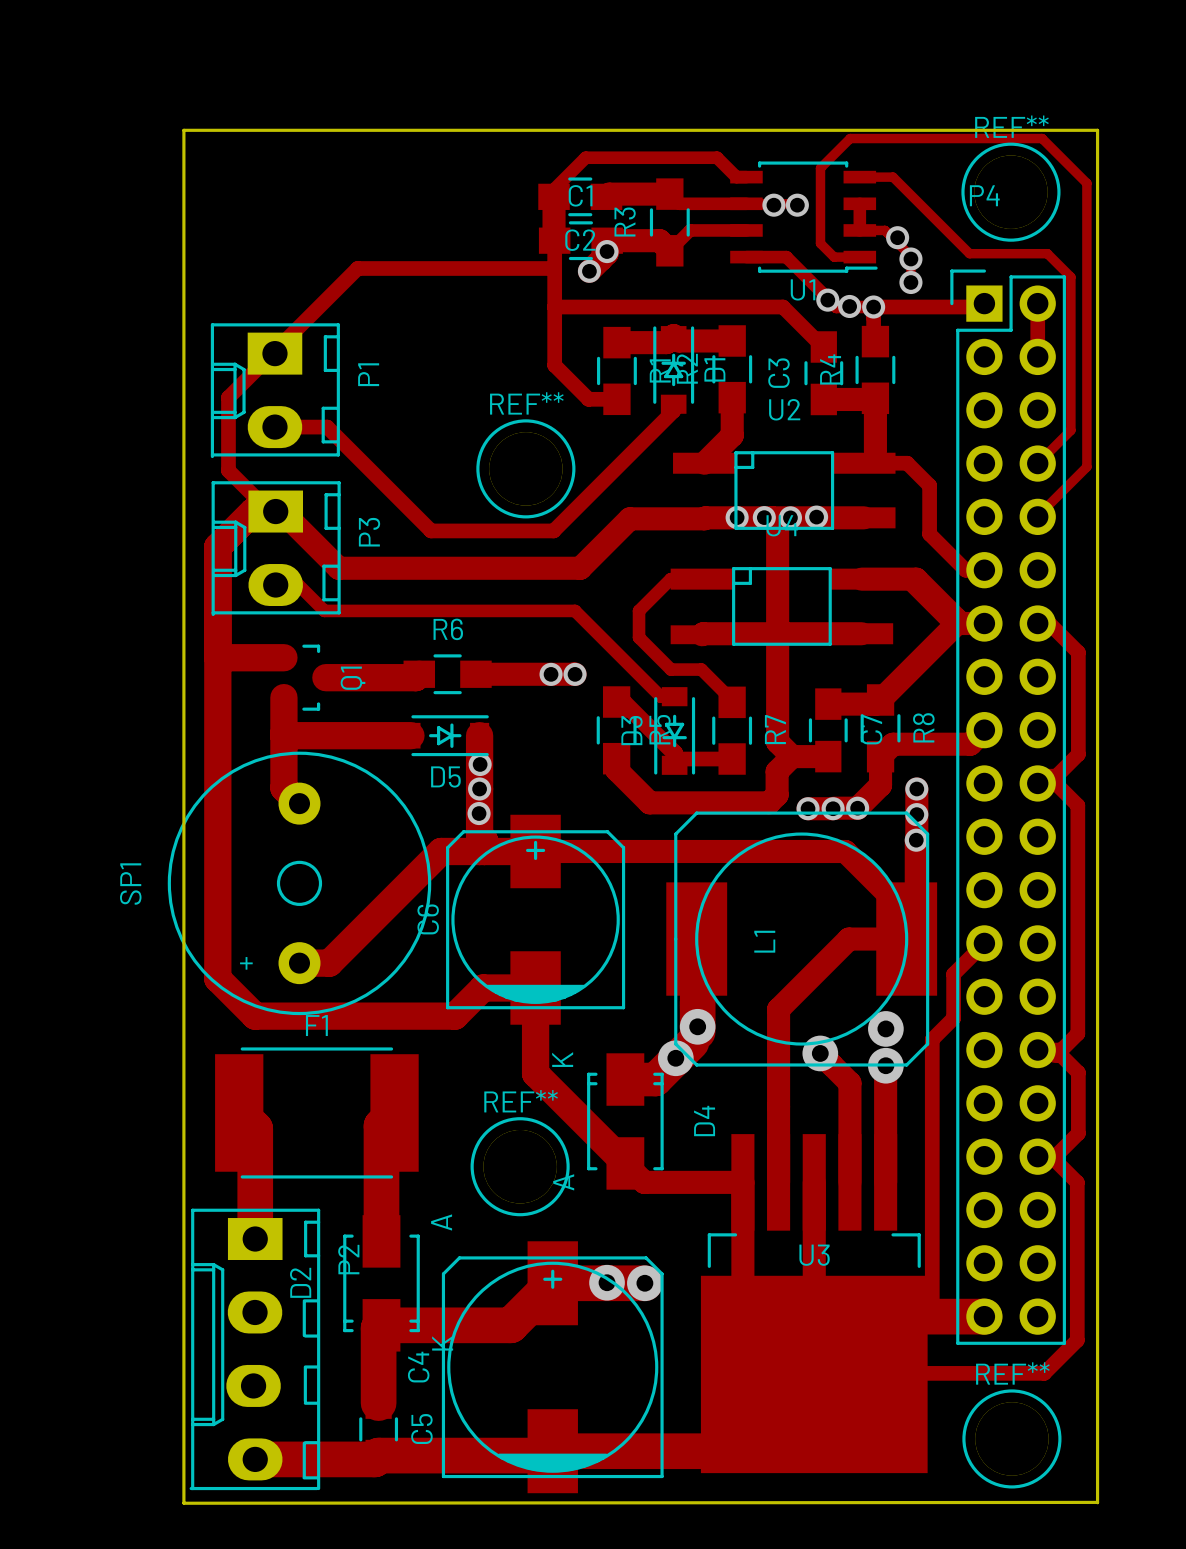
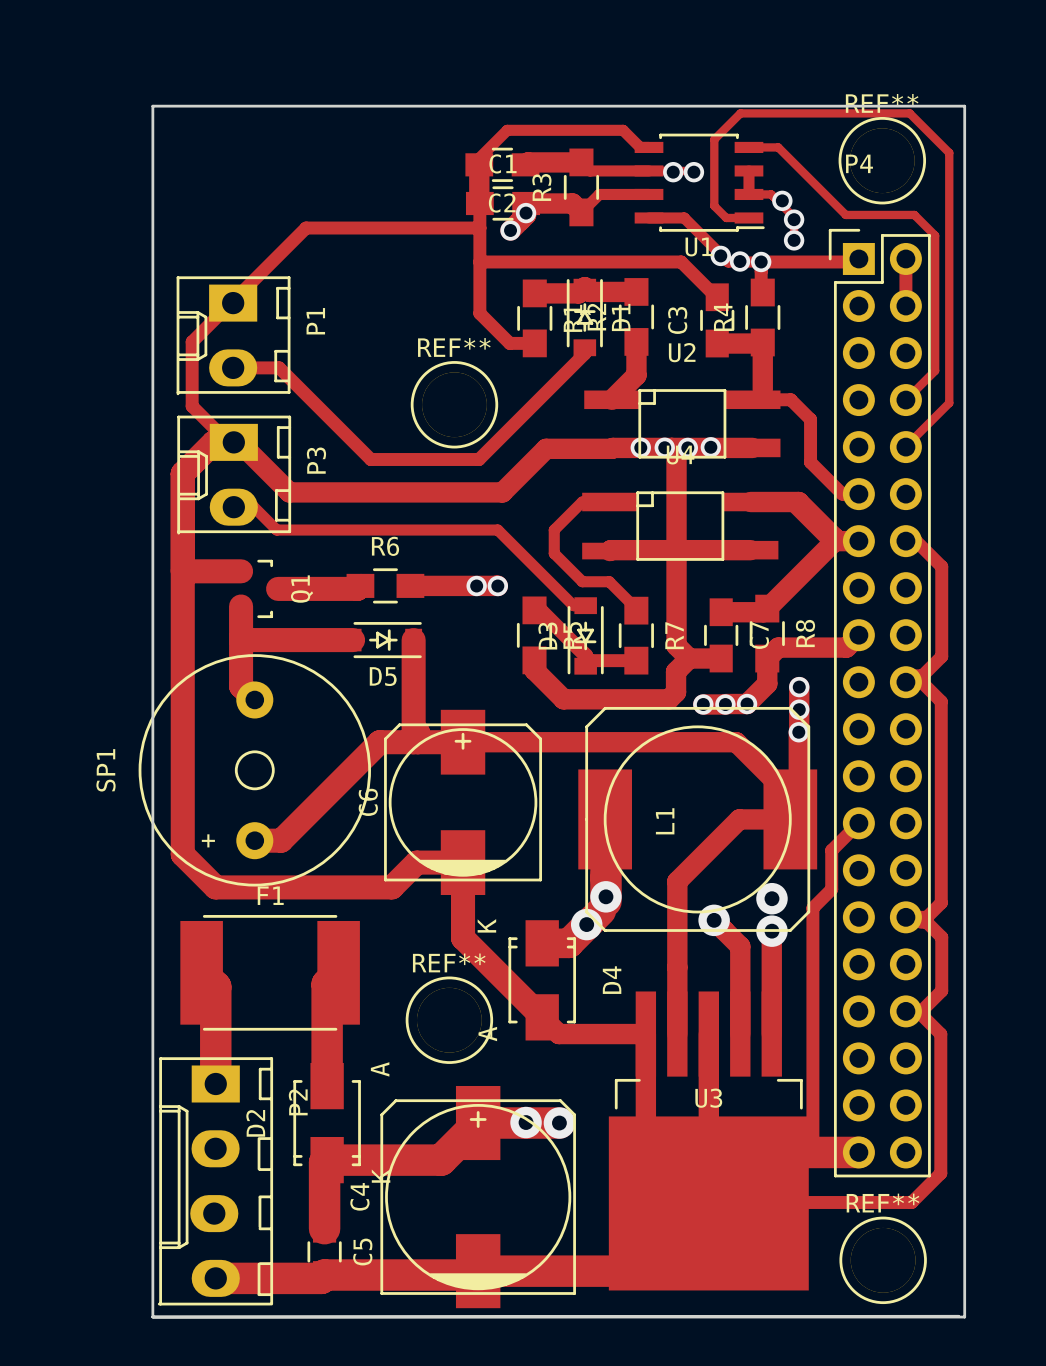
board edge: (1097, 130) (1097, 1502) -> (958, 106) (964, 106) (964, 1317) (152, 1317)
via: (480, 764) -> none
via: (479, 789) -> none
via: (479, 813) -> none

